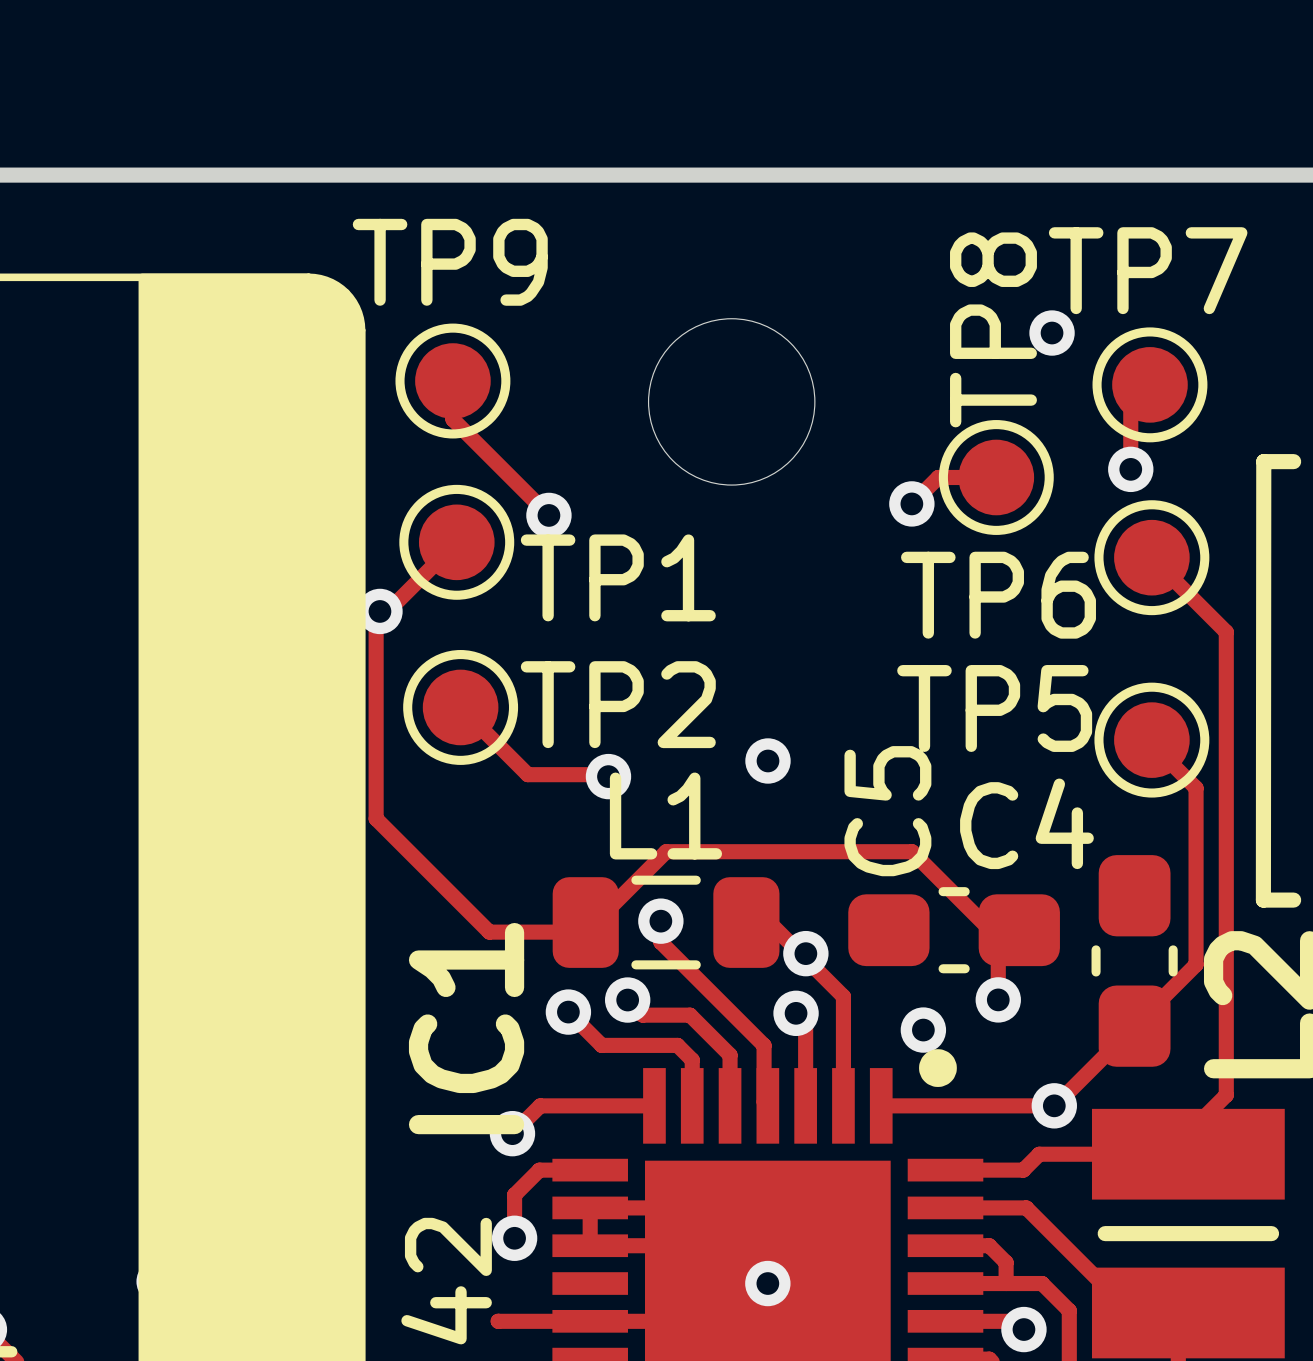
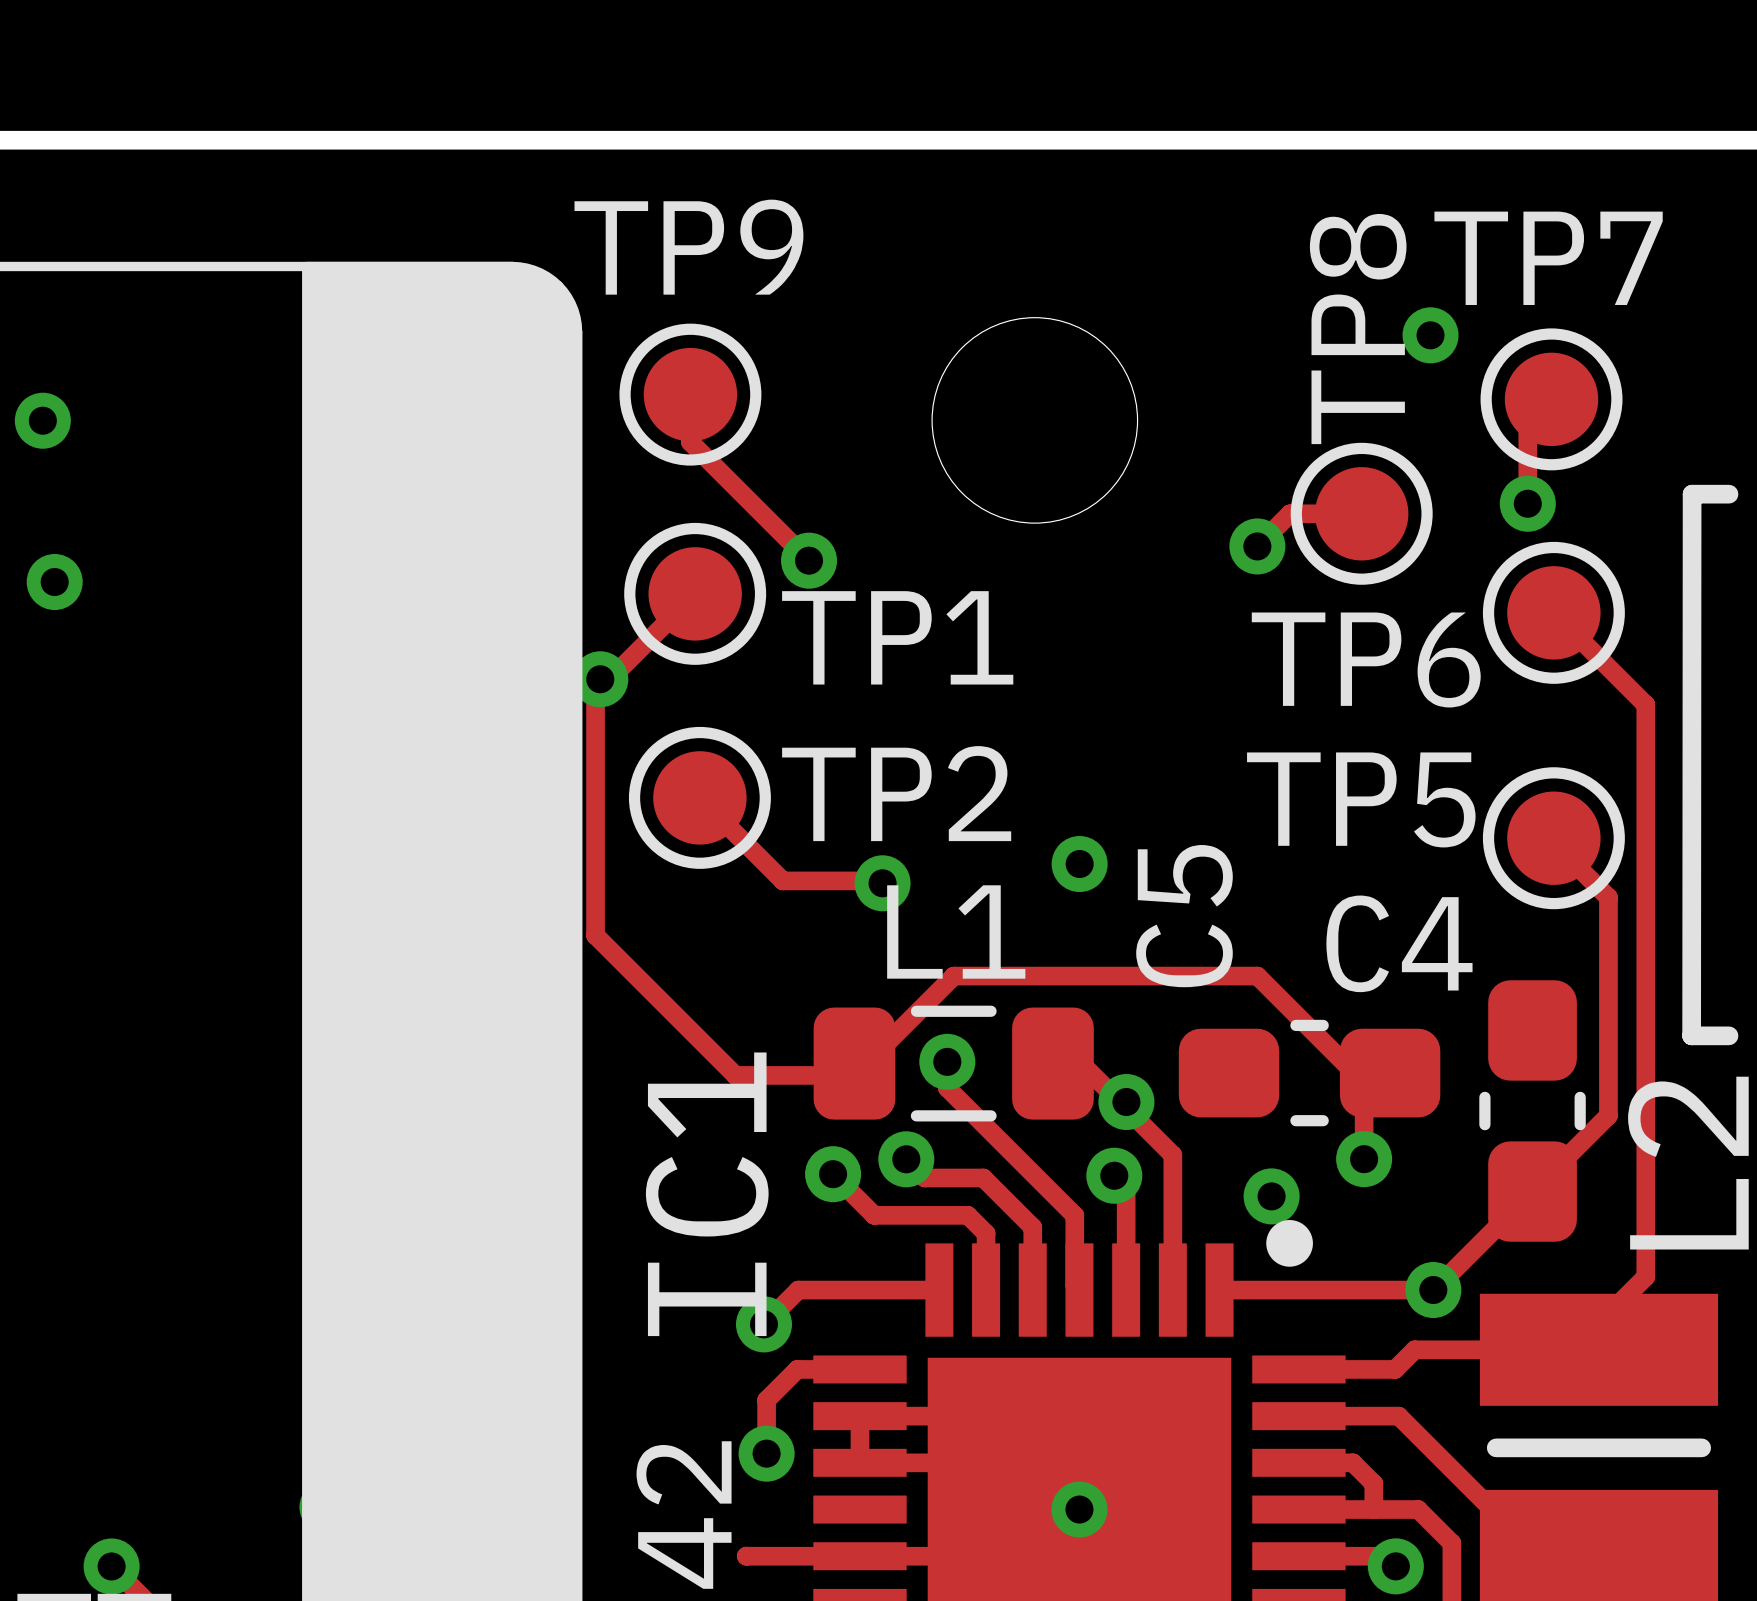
C5 name position: C5 (887, 811) -> C5 (1184, 916)

